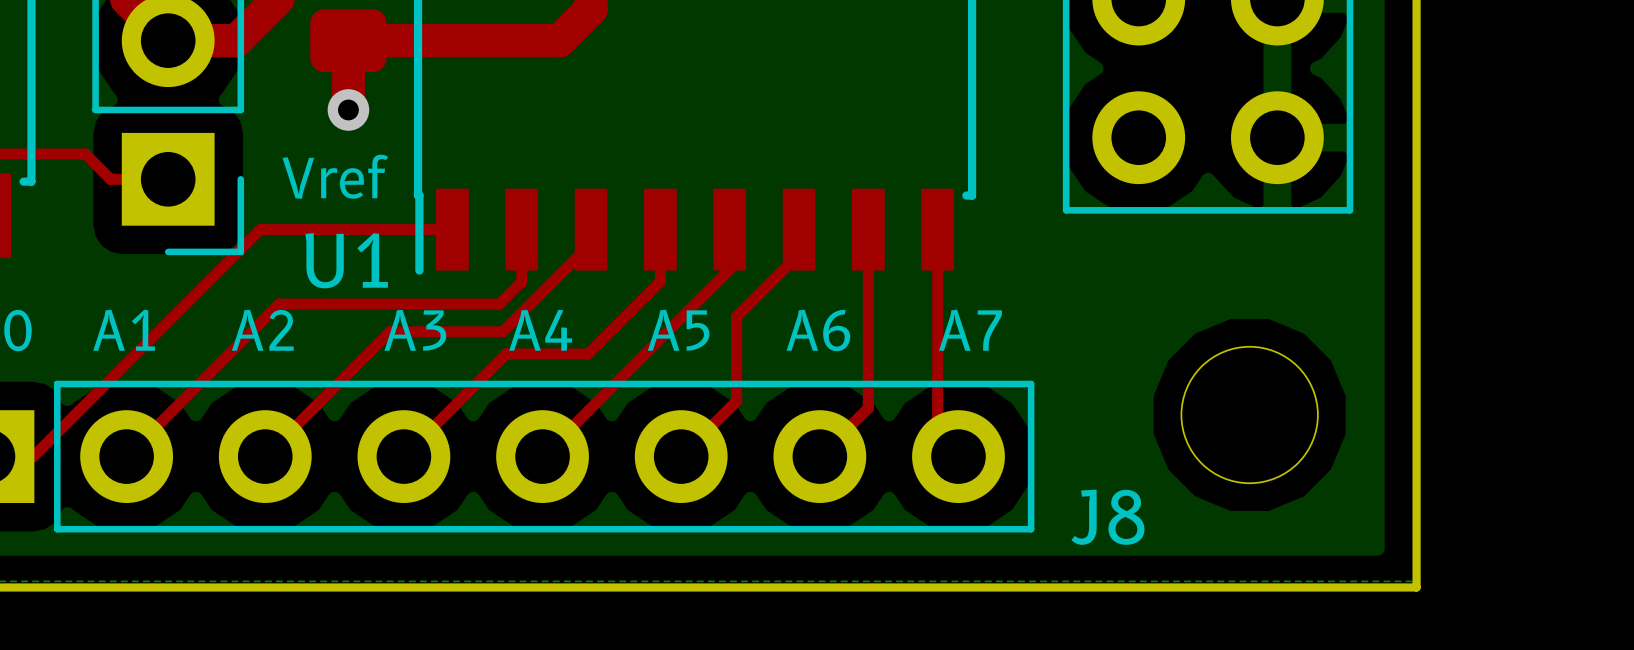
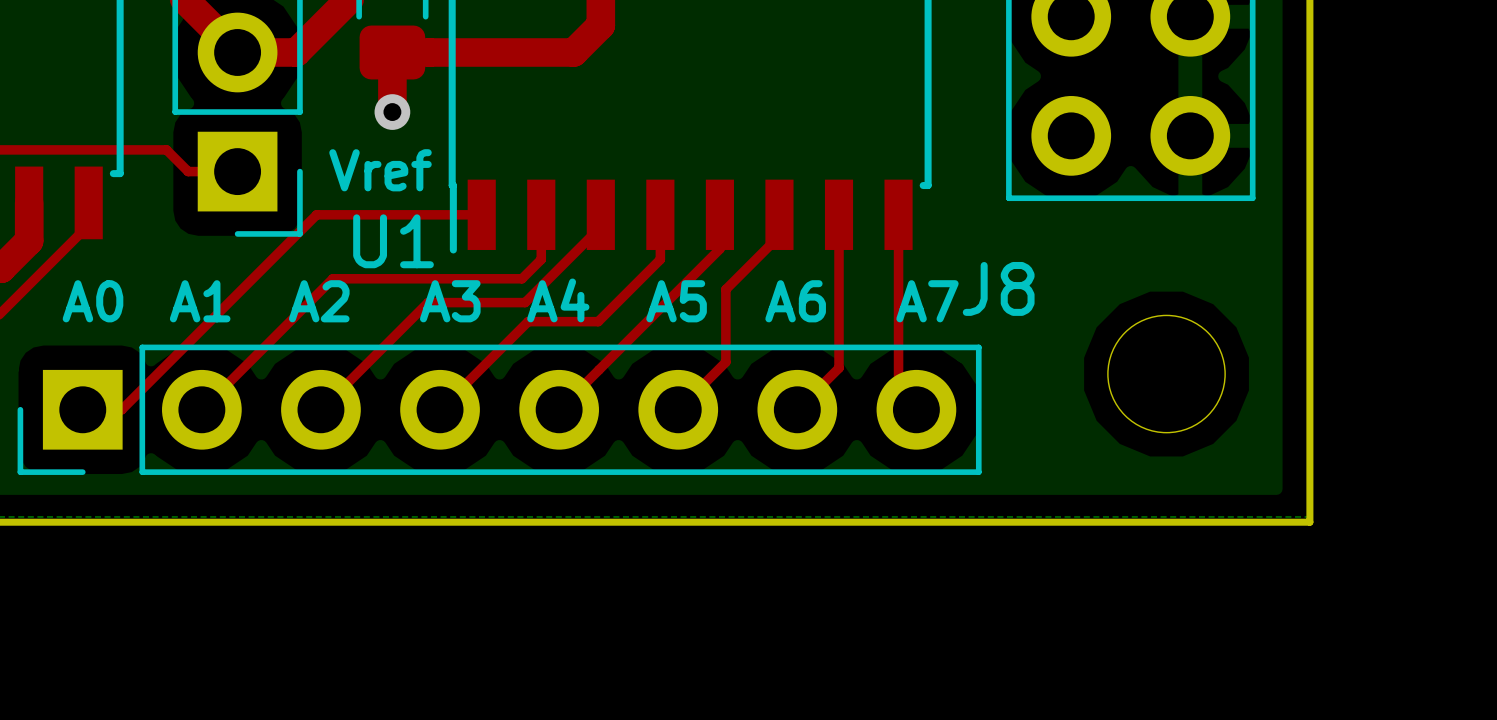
J8 name position: J8 (1107, 517) -> J8 (998, 288)

